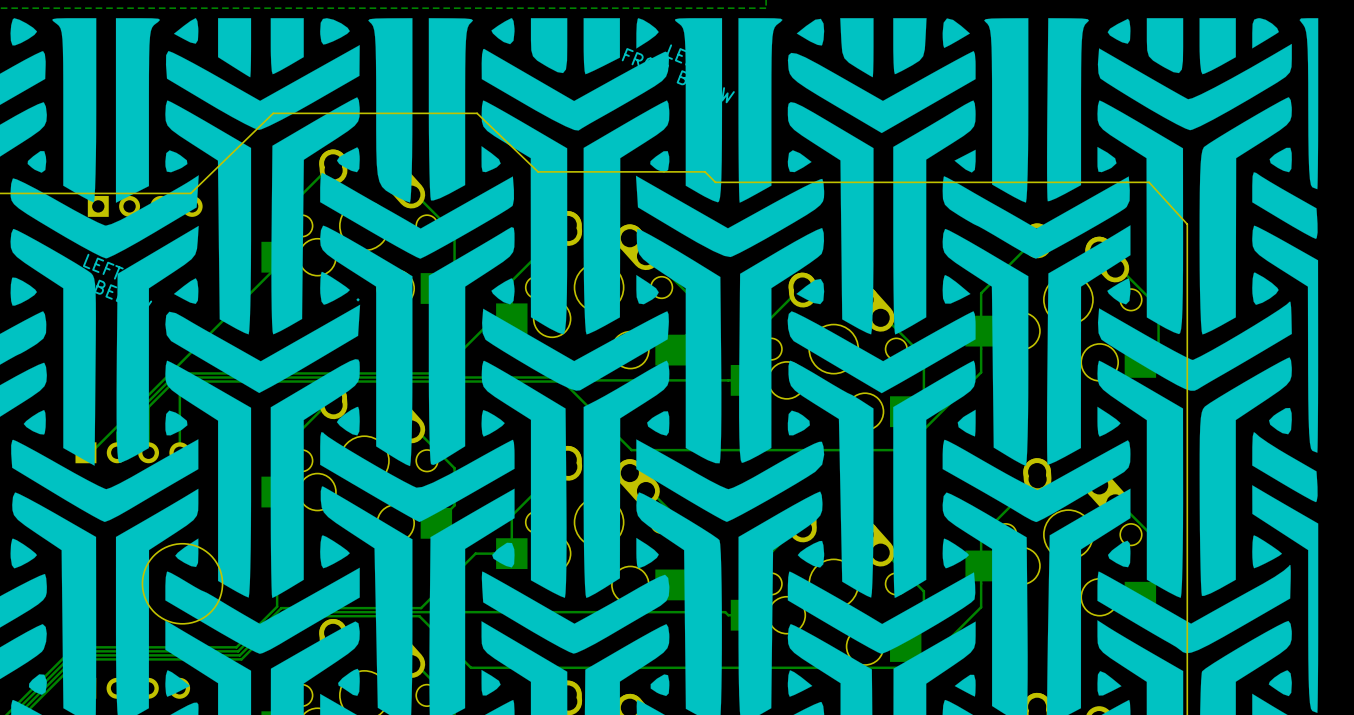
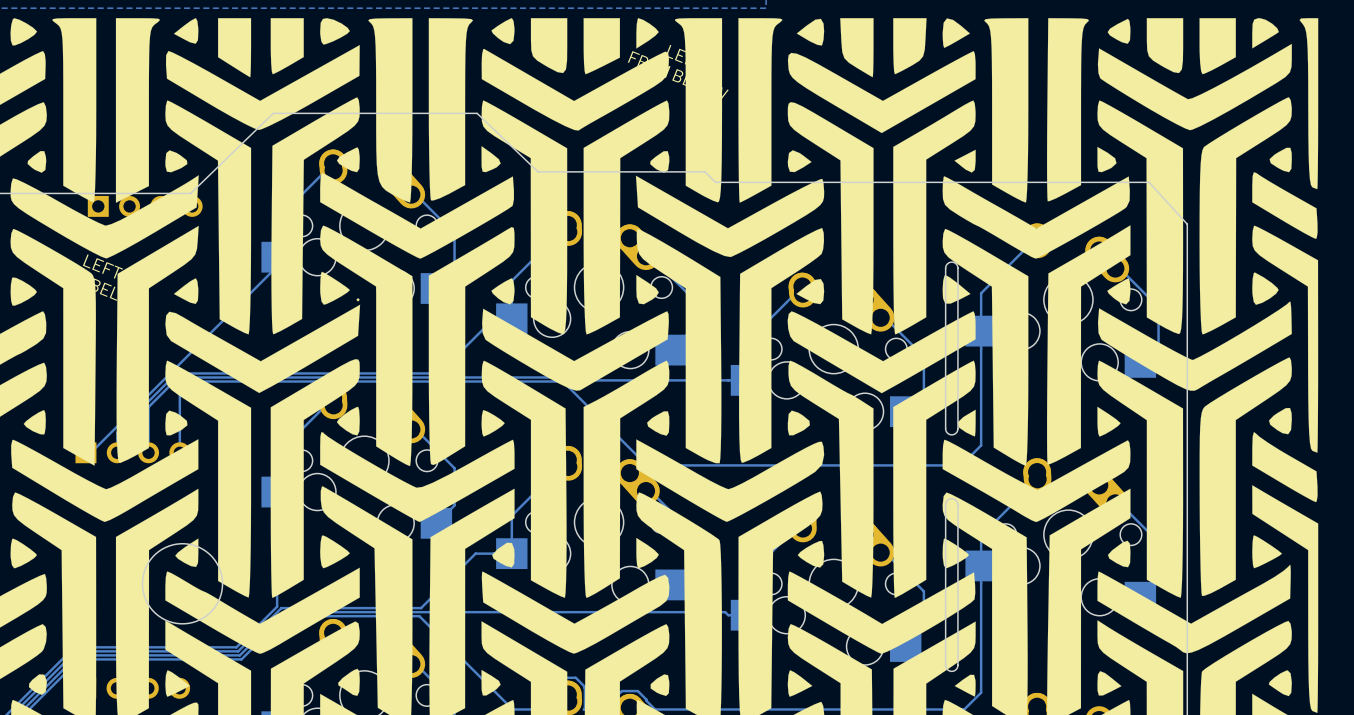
board edge: none -> (957, 268) (957, 428) (956, 433) (951, 434) (947, 433) (945, 428) (945, 268) (947, 263) (951, 262) (956, 263) (957, 268)
track: (981, 372) (903, 450) (631, 450) -> (981, 372) (981, 445) (961, 465) (646, 465) (631, 450)
board edge: none -> (957, 504) (957, 665) (956, 669) (951, 671) (947, 669) (945, 665) (945, 504) (947, 500) (951, 498) (956, 500) (957, 504)
track: (981, 607) (920, 667) (471, 667) -> (981, 607) (981, 692) (964, 709) (655, 709) (637, 691) (621, 691) (613, 699) (613, 709) (583, 709) (584, 688) (575, 677) (559, 677) (551, 686) (551, 705) (547, 709) (512, 709) (471, 667)

